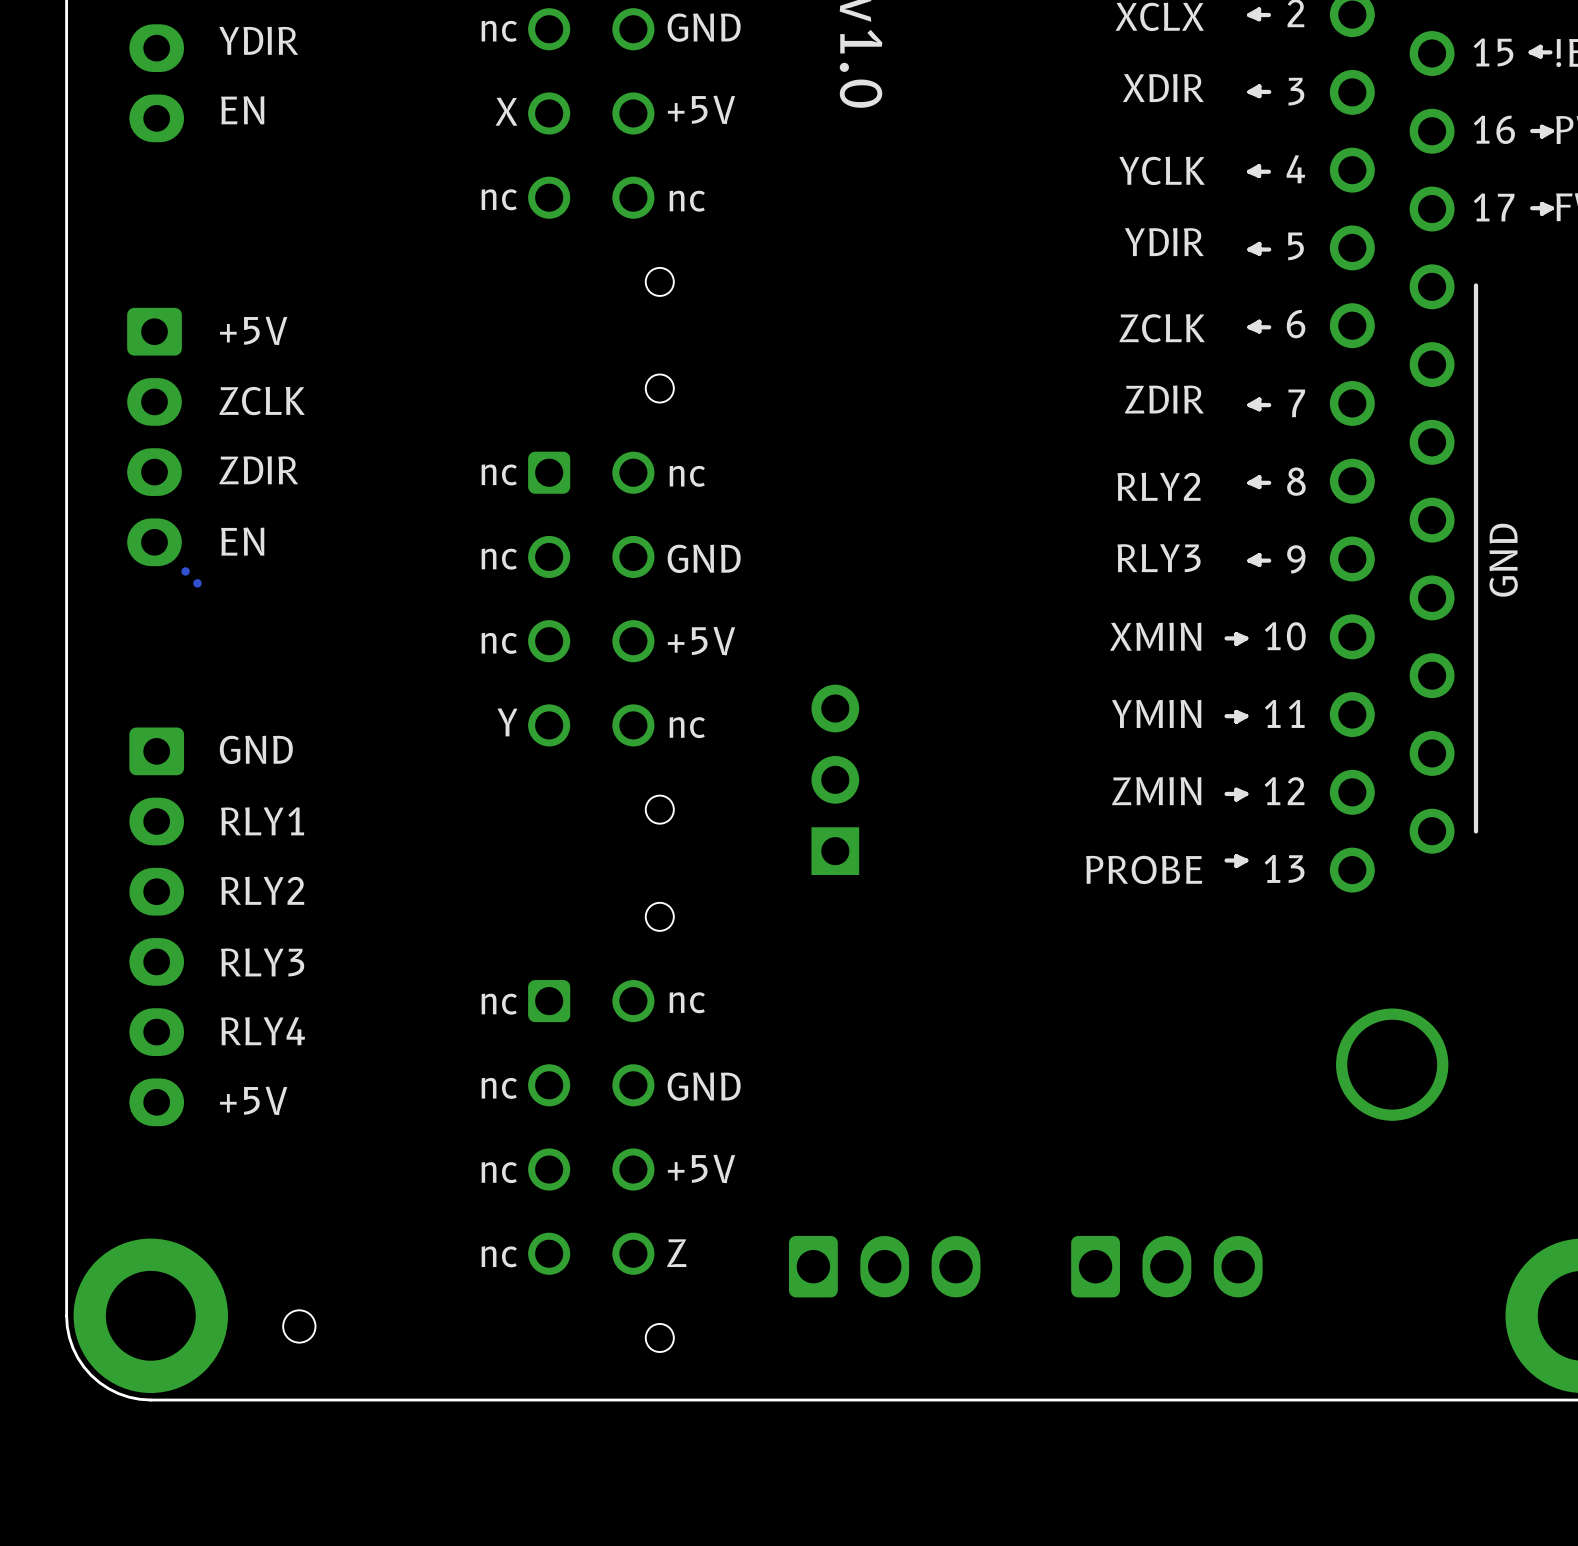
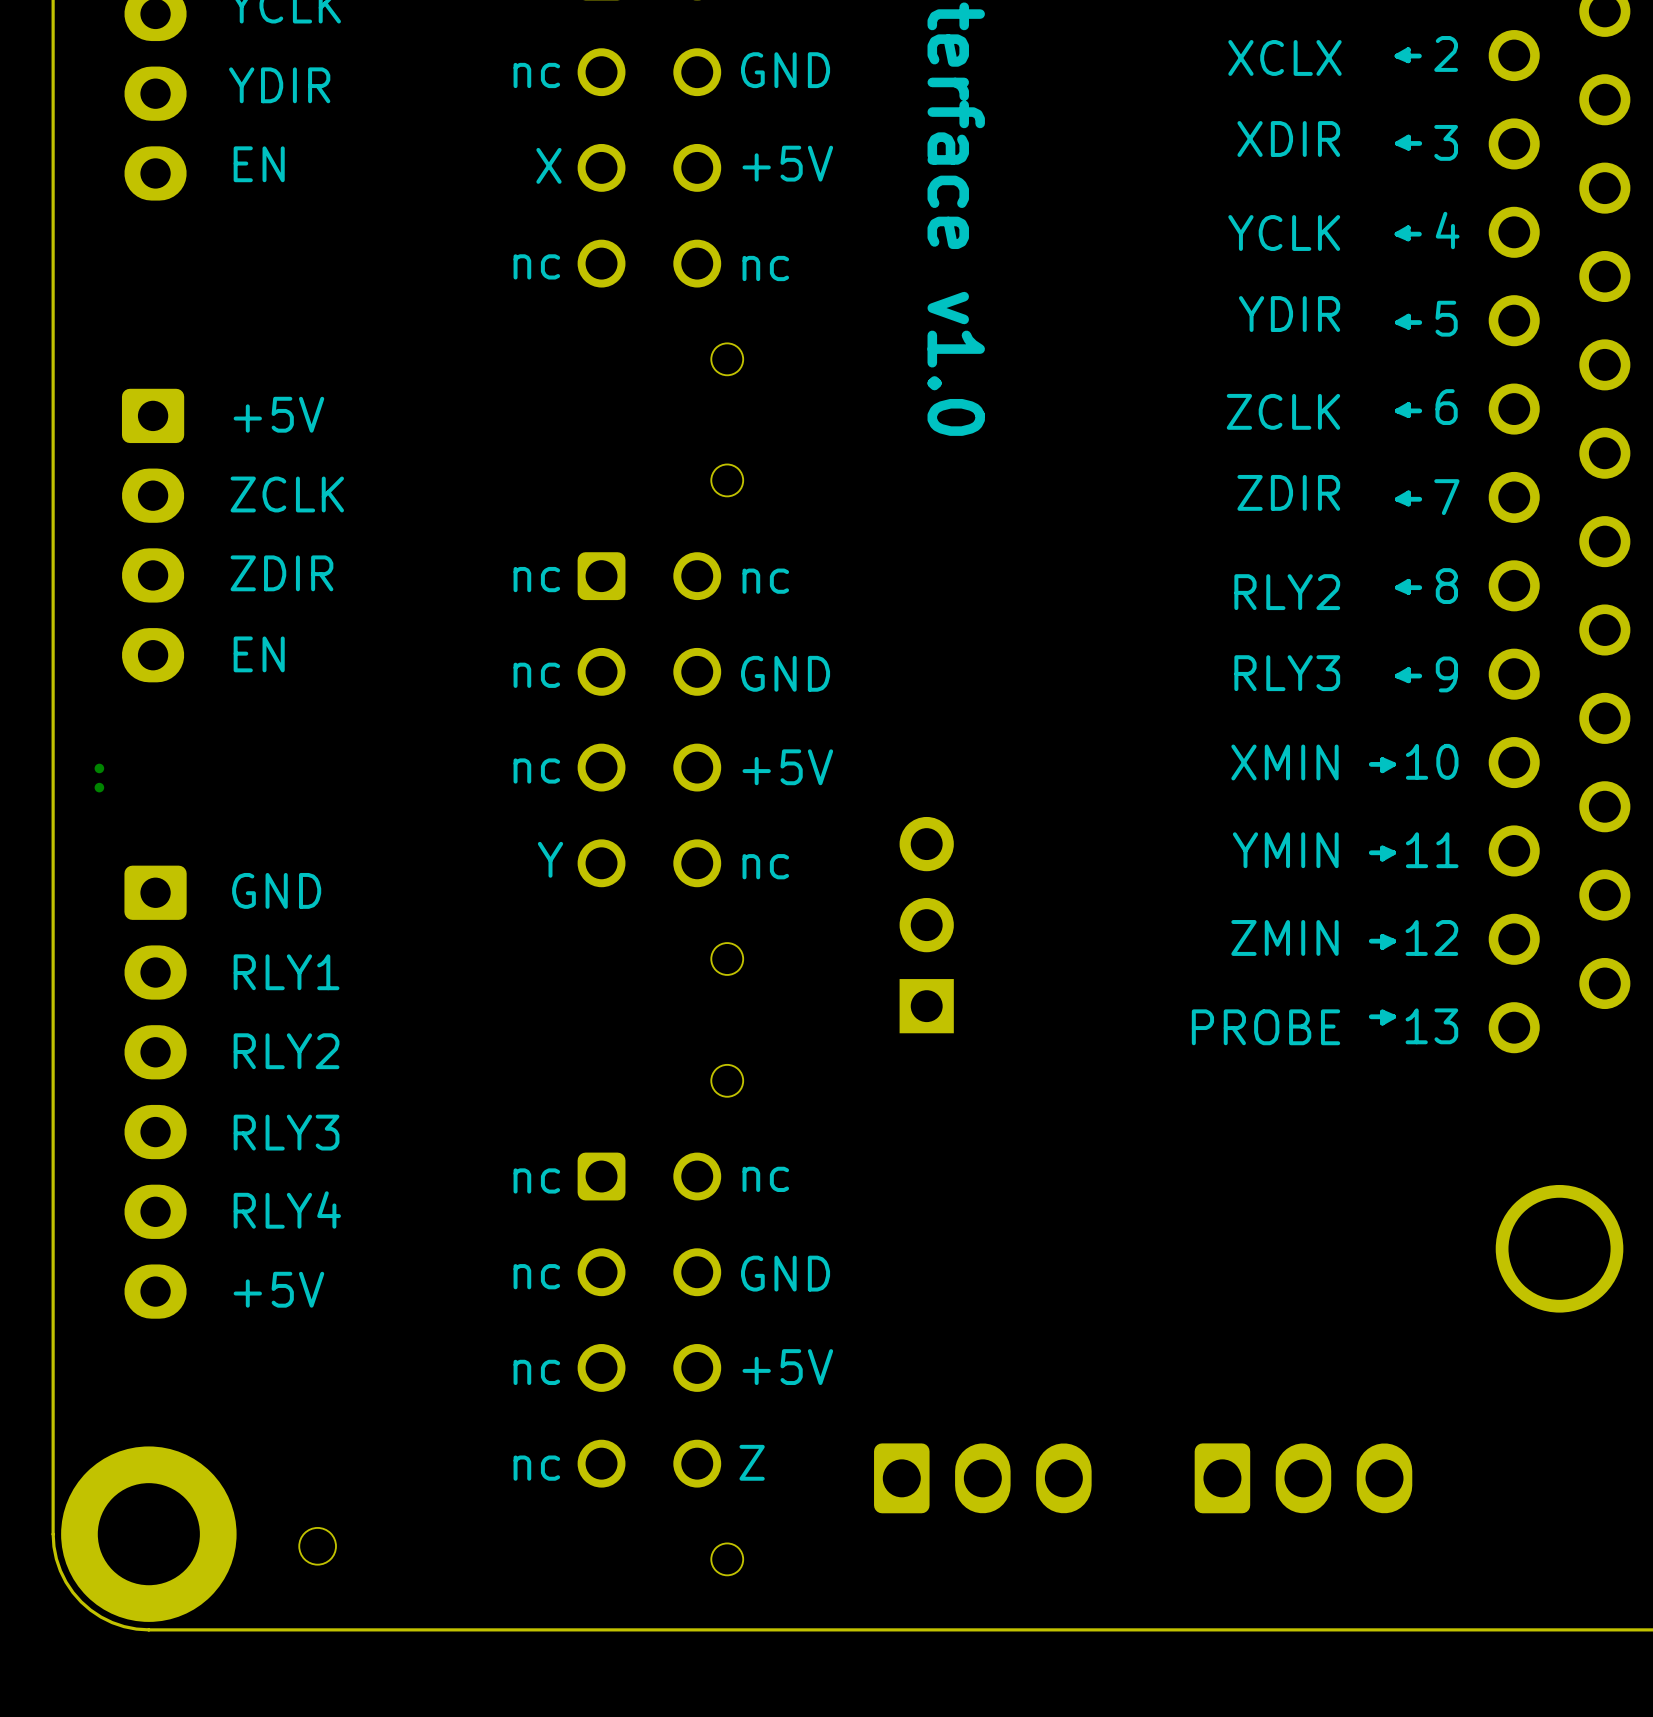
part: (191, 577) -> none
part: none -> (99, 778)

